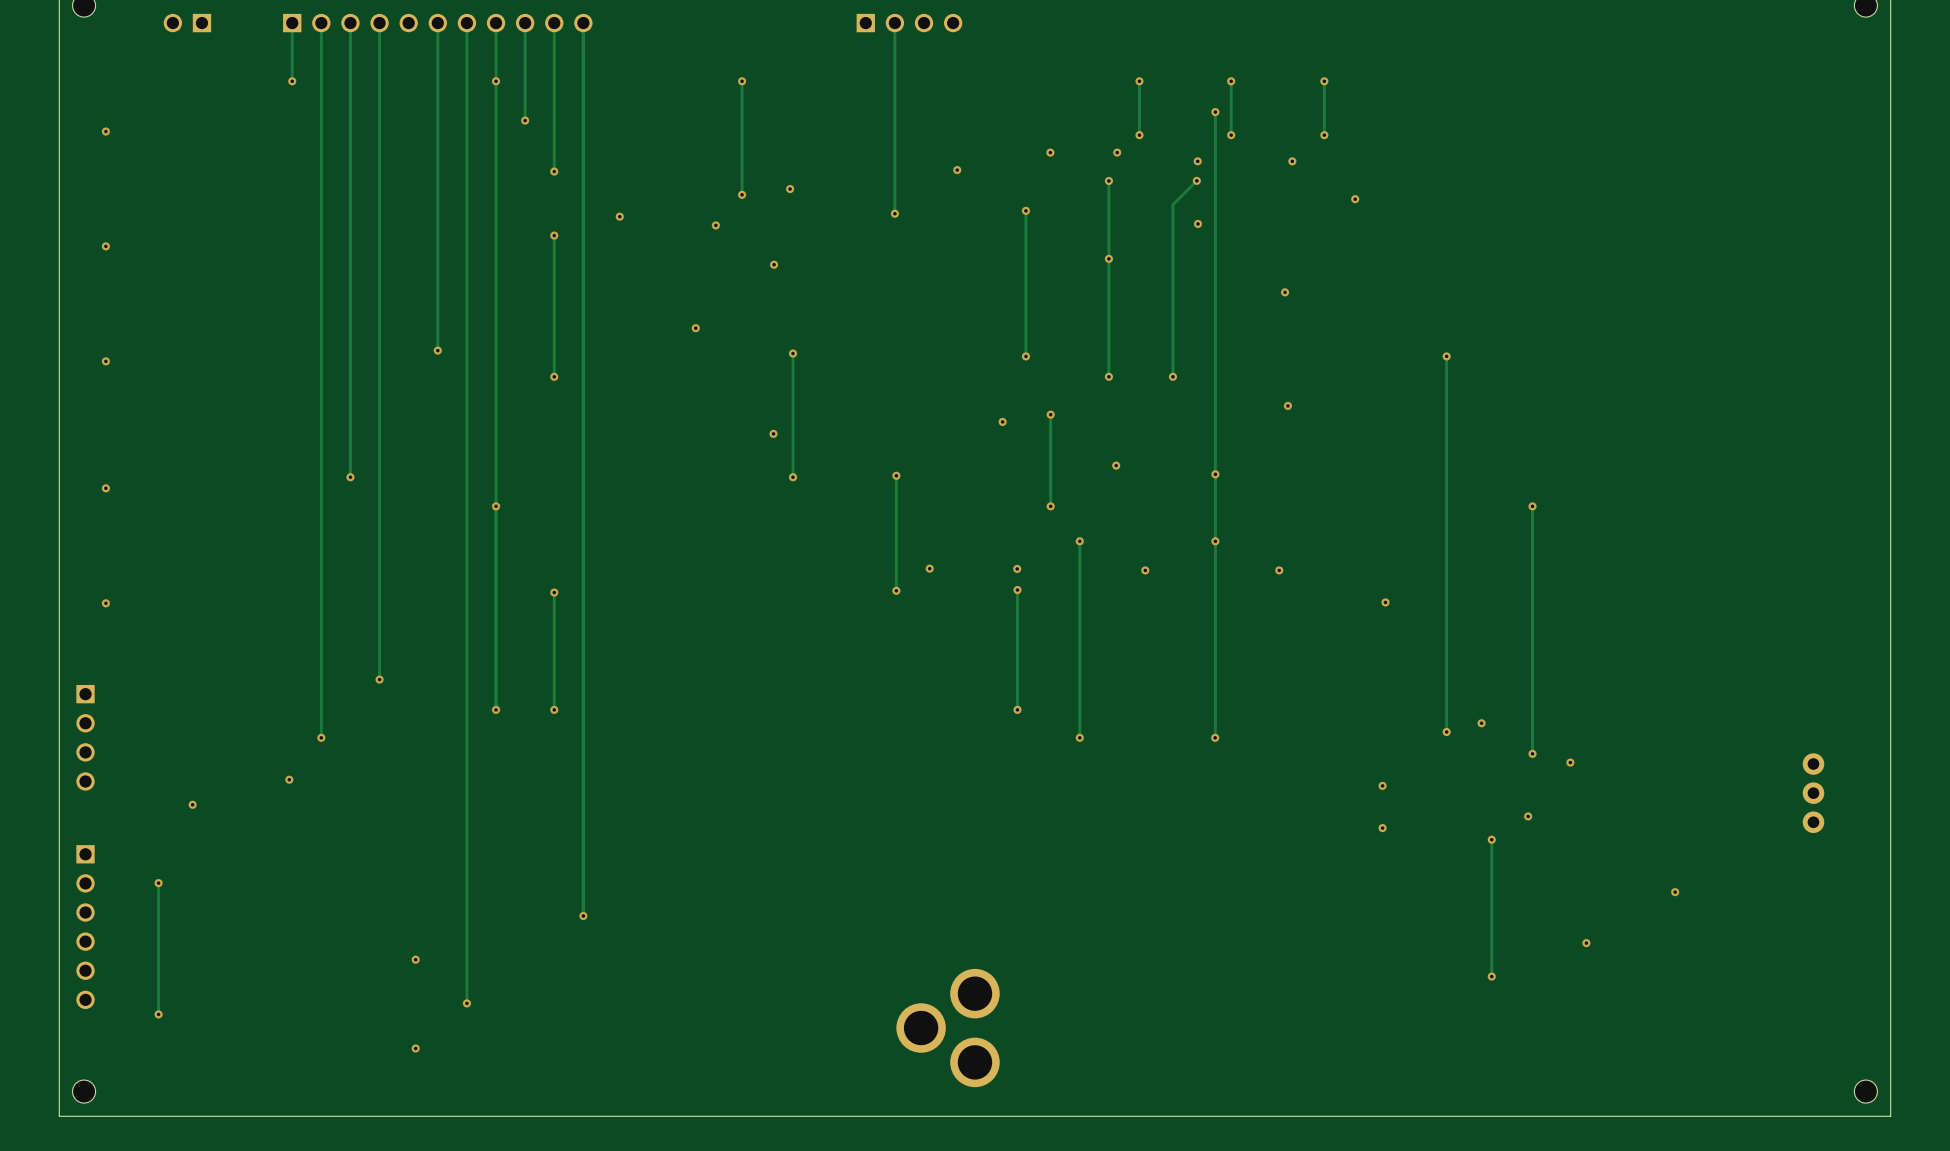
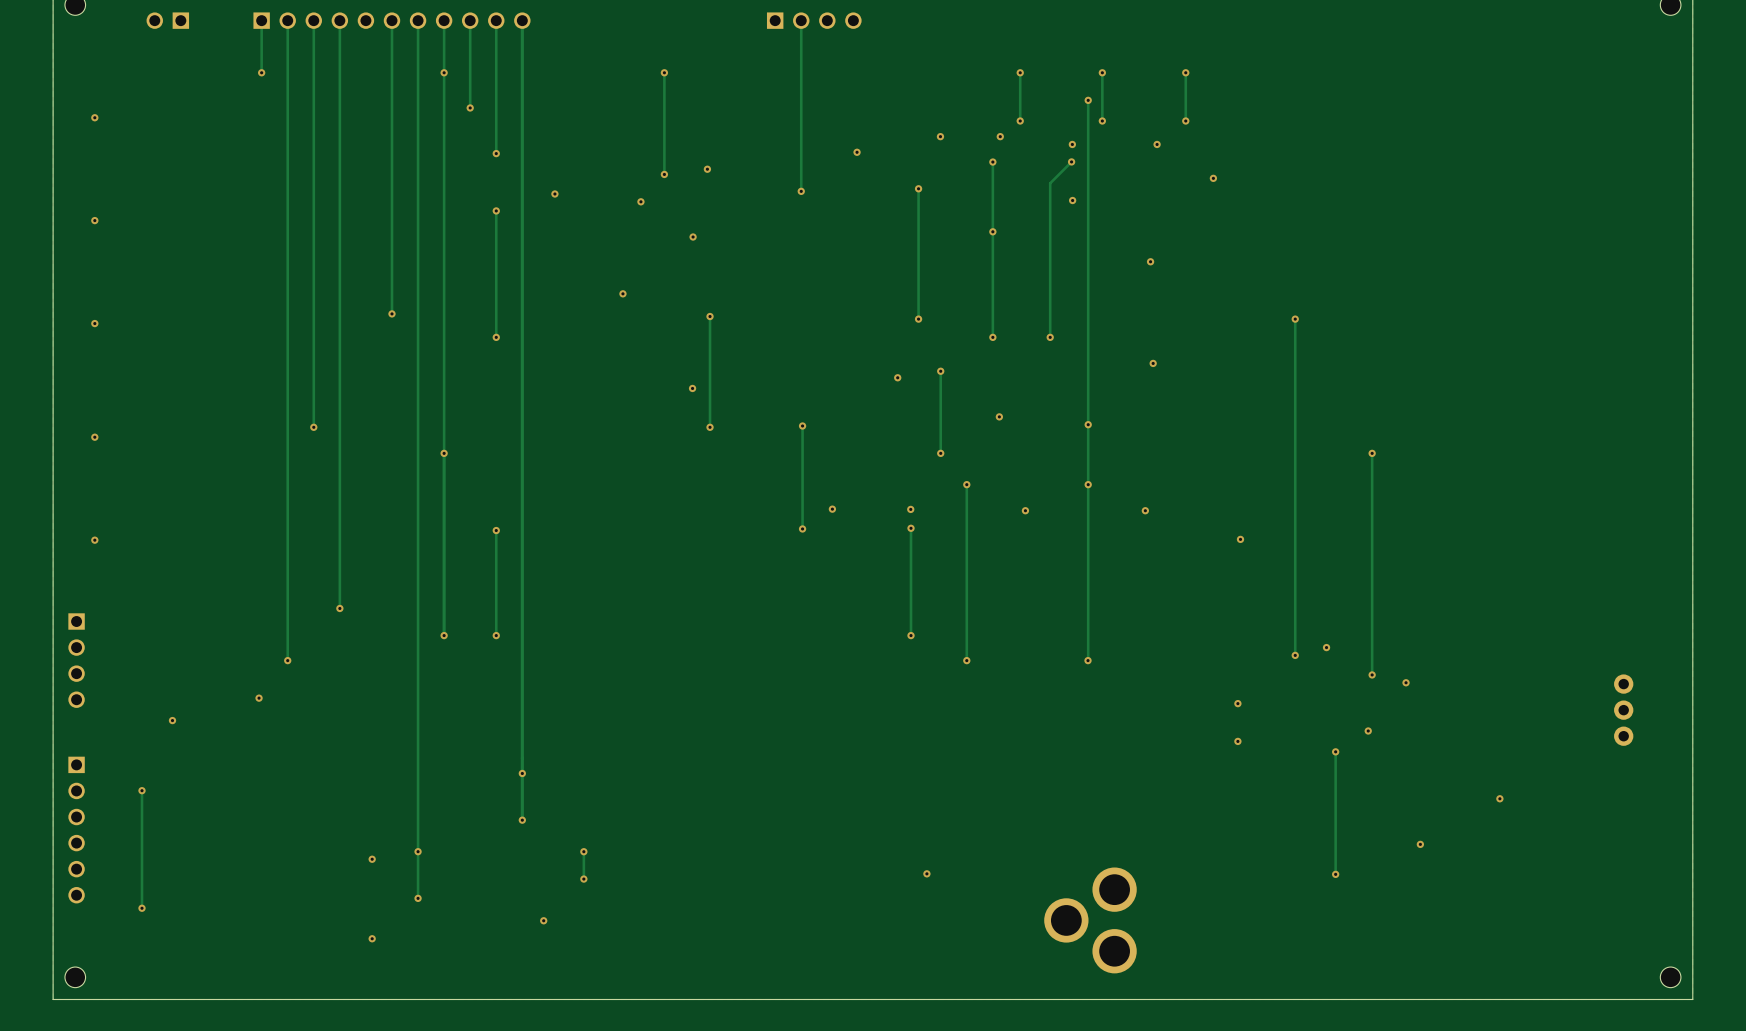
via: none -> (522, 773)
via: none -> (418, 851)
track: none -> (583, 851) (583, 879)
via: none -> (583, 851)
via: none -> (926, 873)
via: none -> (583, 879)
via: none -> (543, 920)
part position: (948, 1028) -> (1090, 920)

